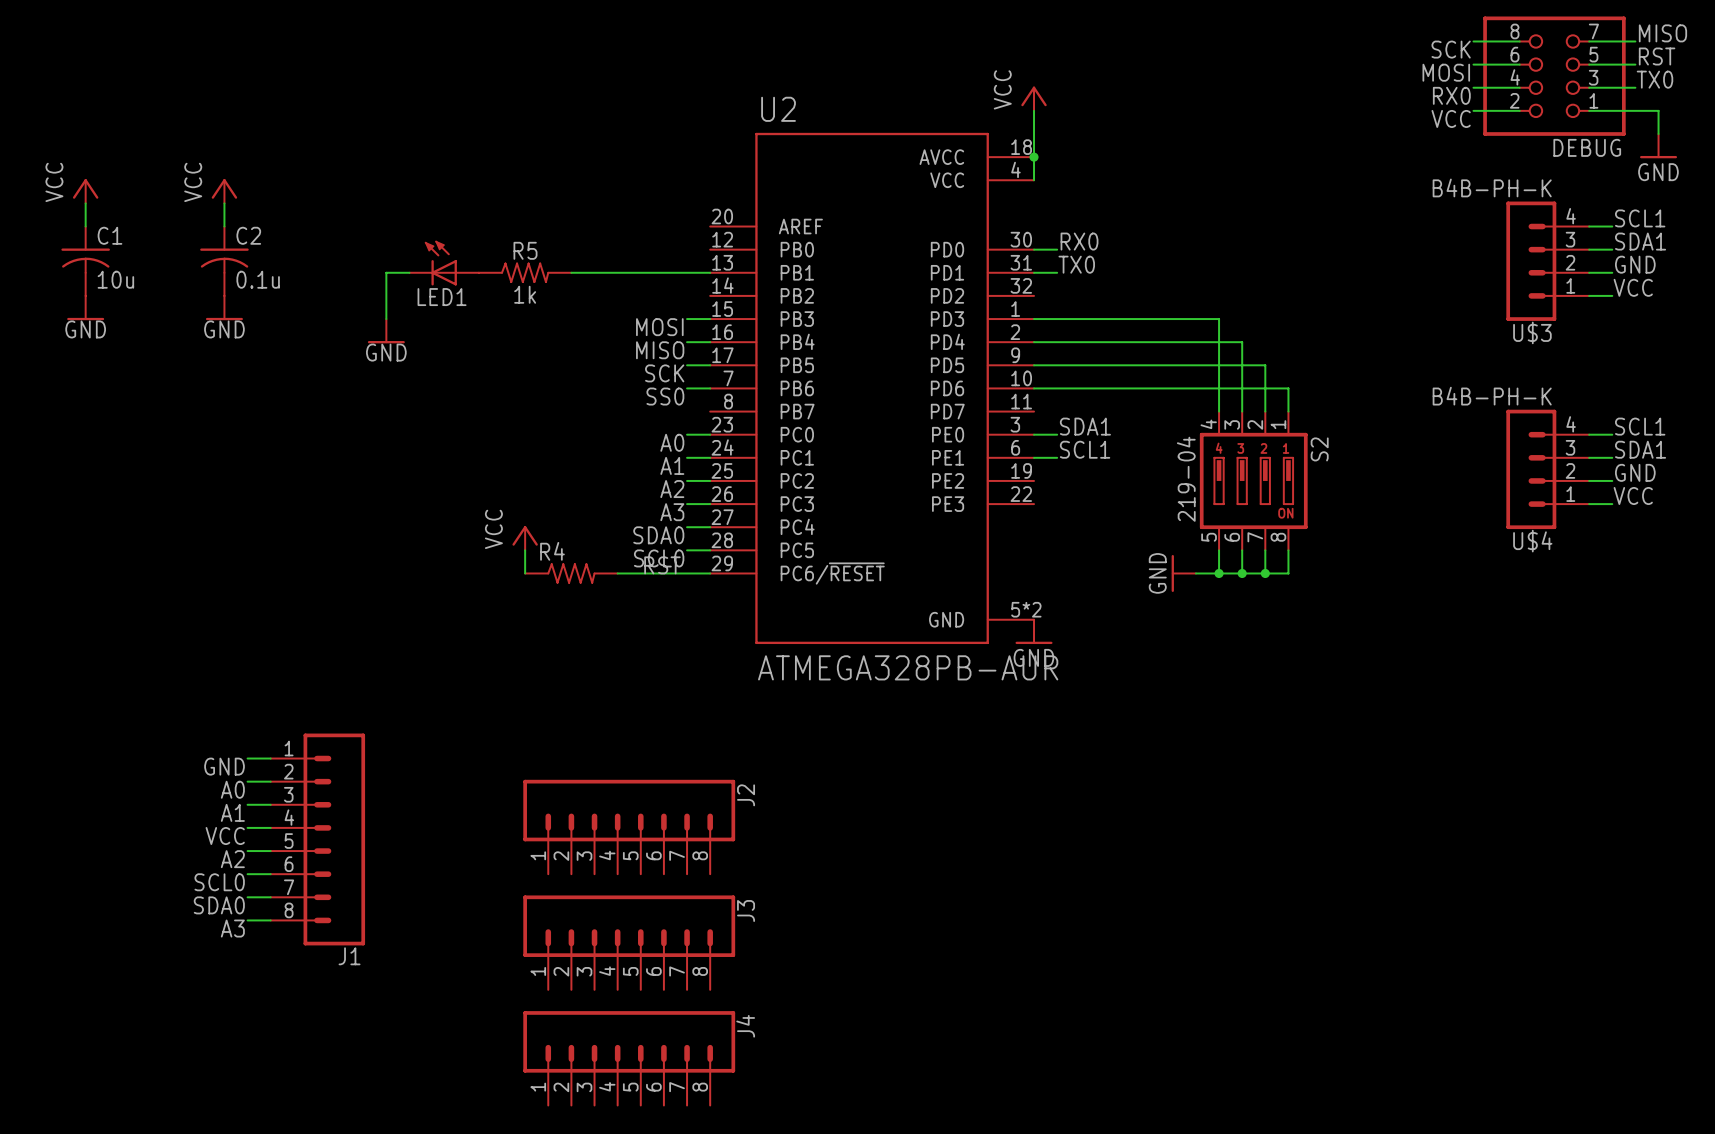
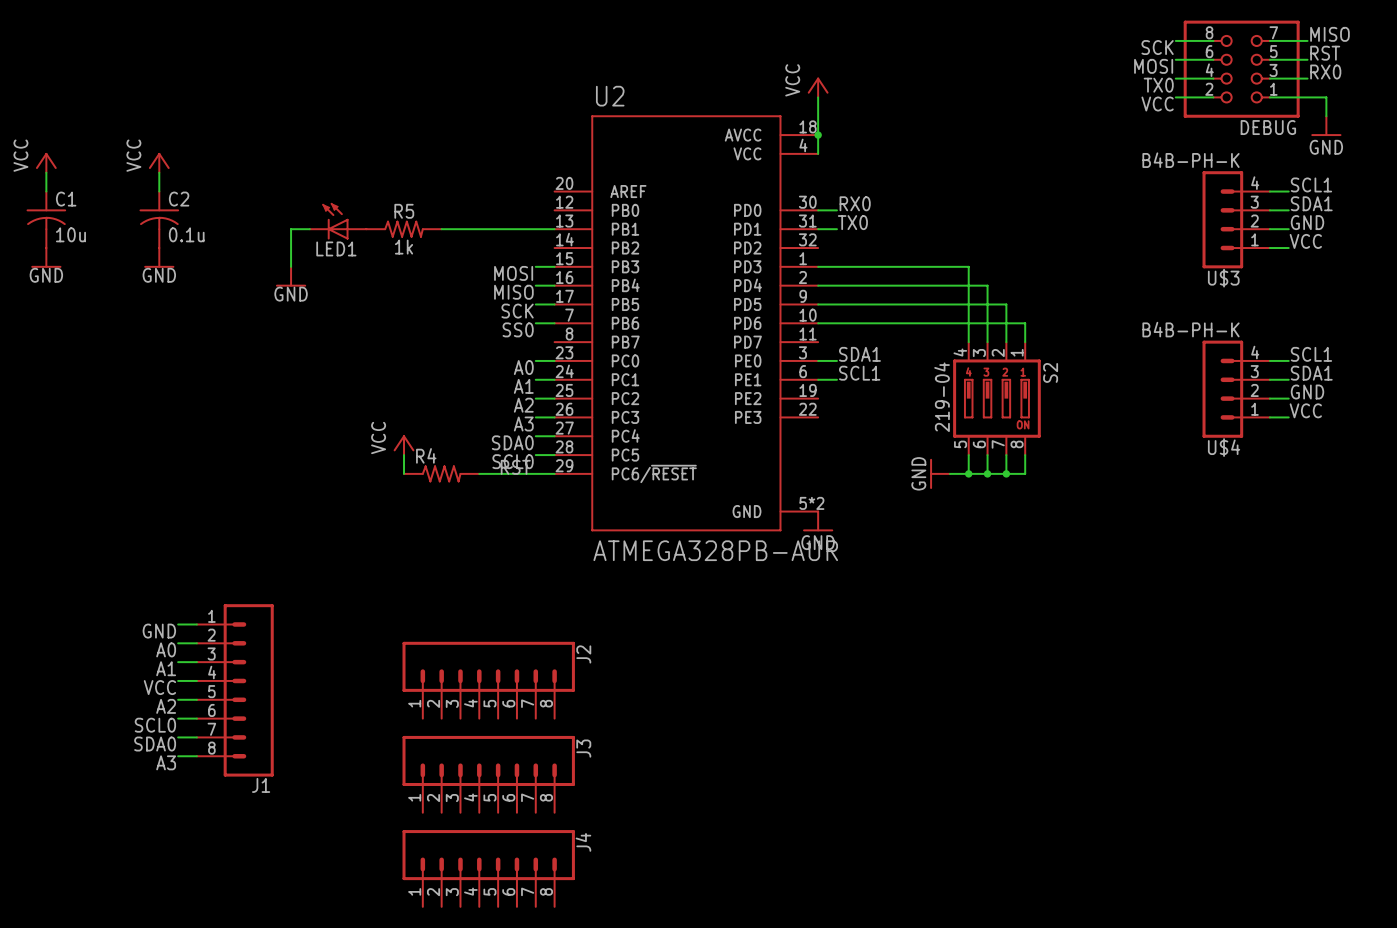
label: TX0 (1654, 79) -> RX0 (1325, 72)
label: RX0 (1451, 95) -> TX0 (1158, 85)

